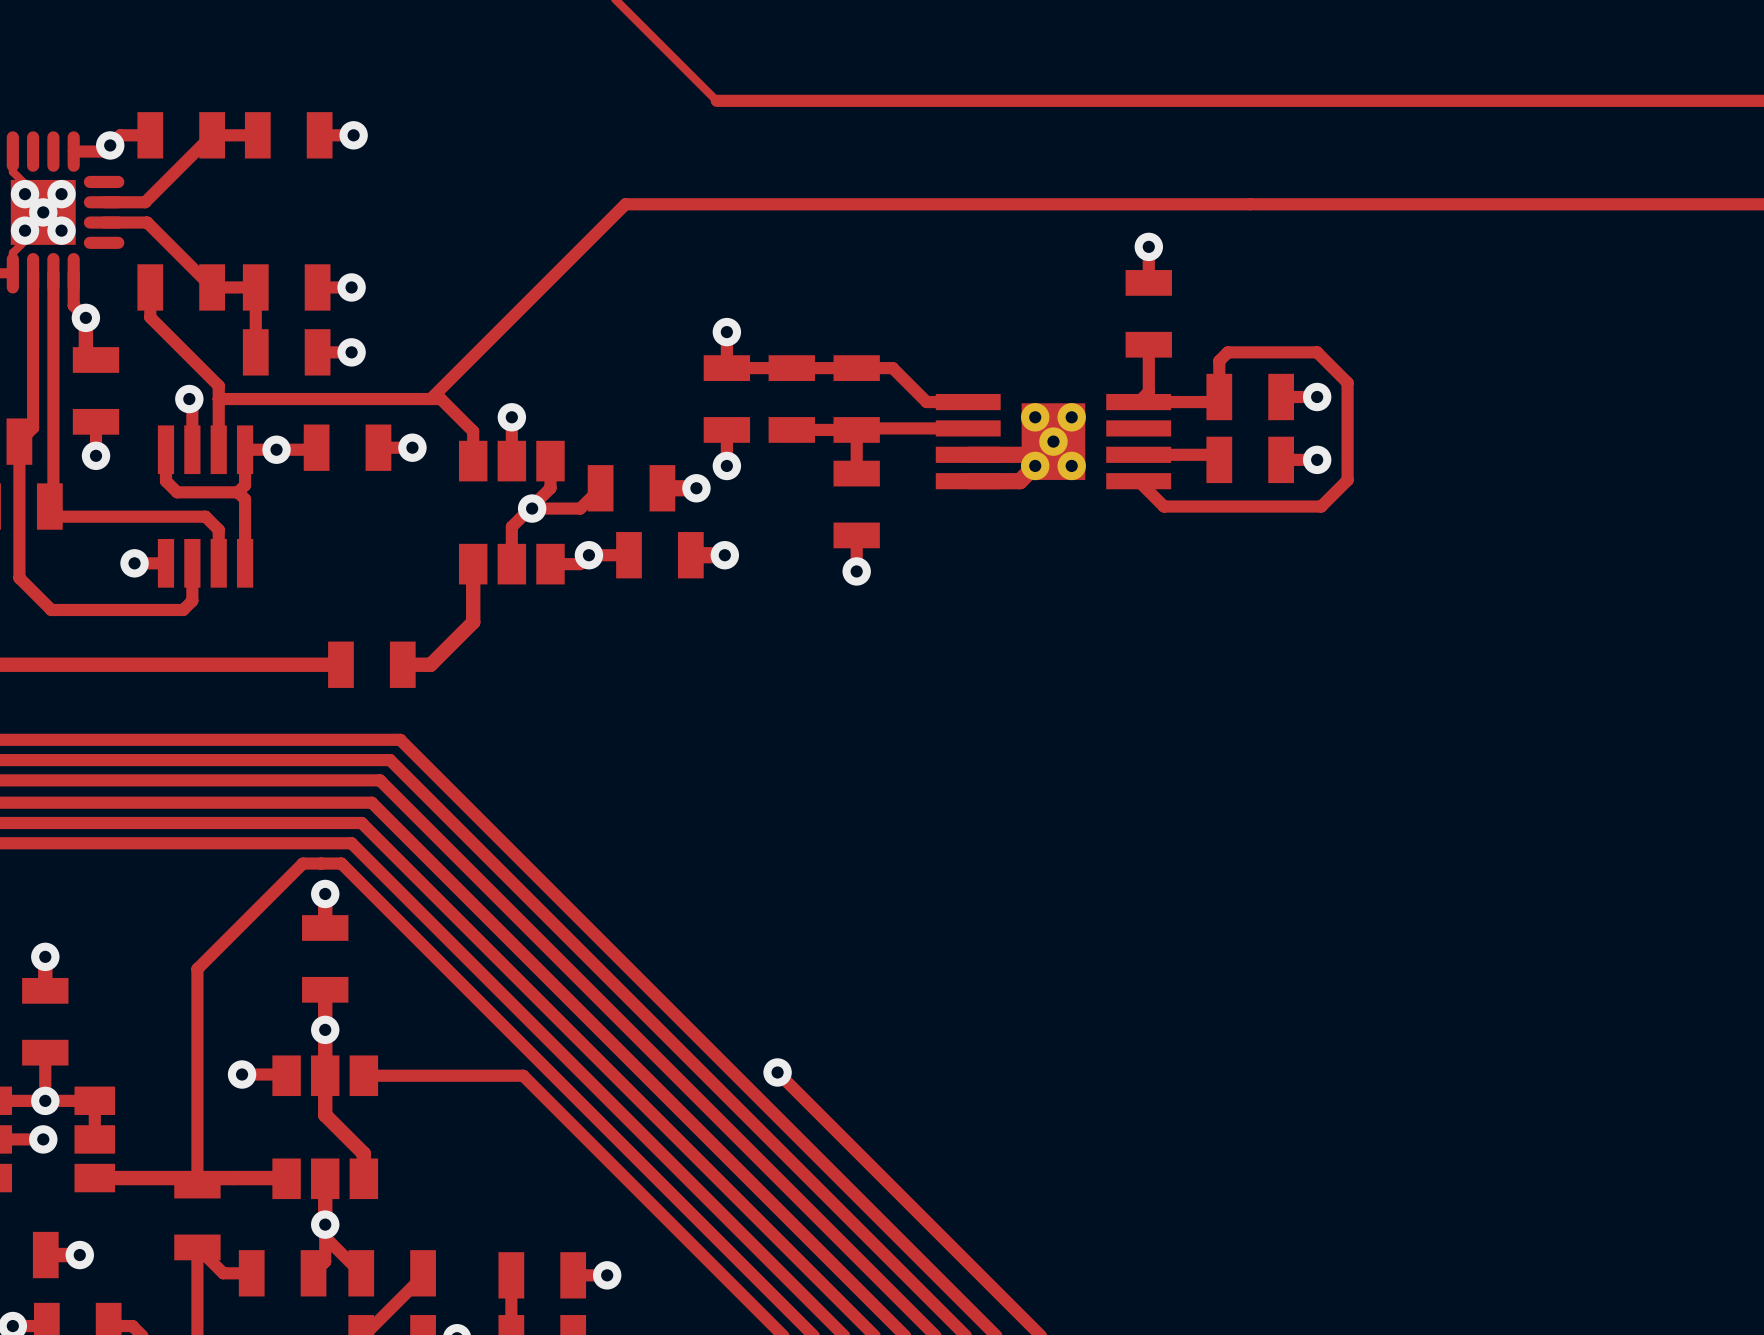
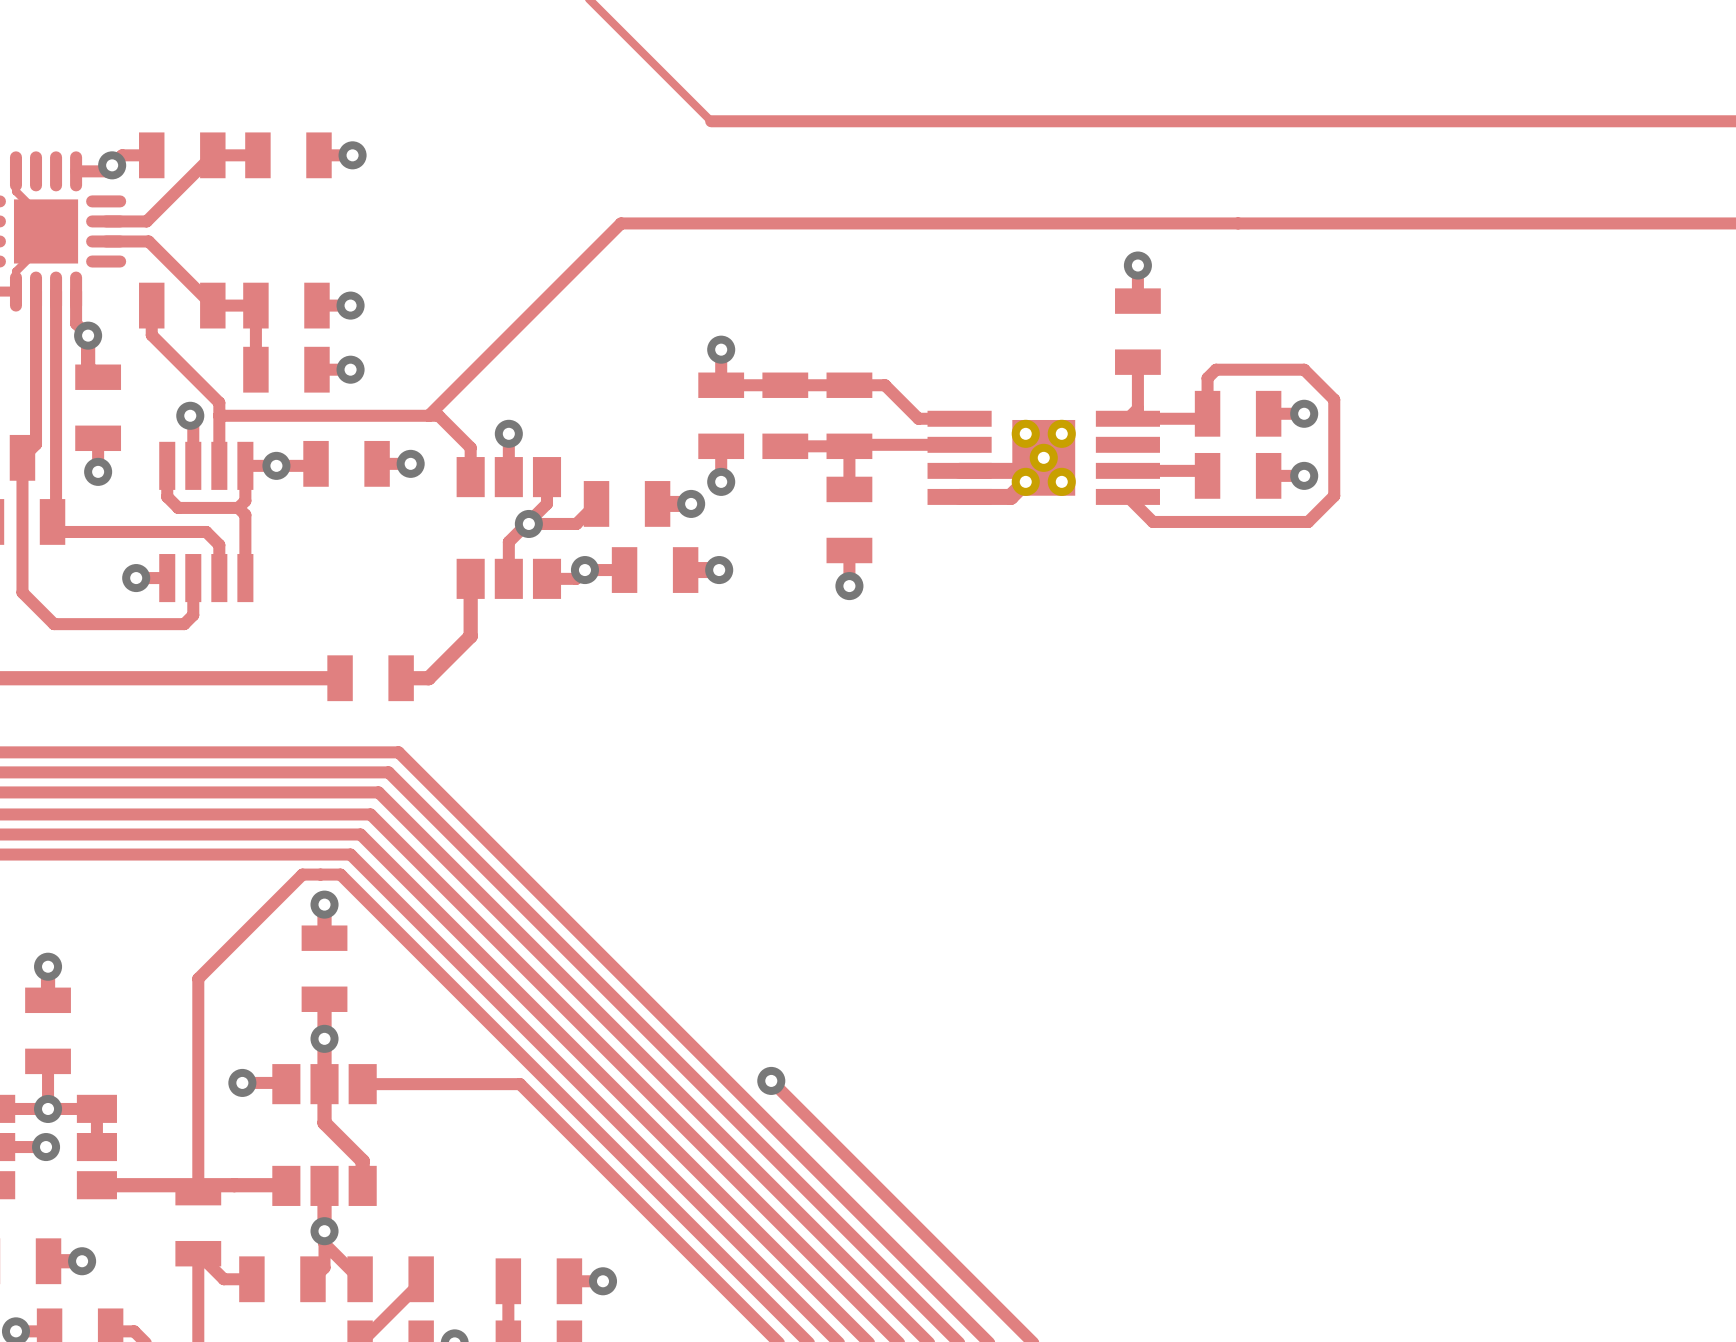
via: (25, 194) -> none
via: (61, 194) -> none
via: (43, 212) -> none
via: (25, 230) -> none
via: (61, 230) -> none

